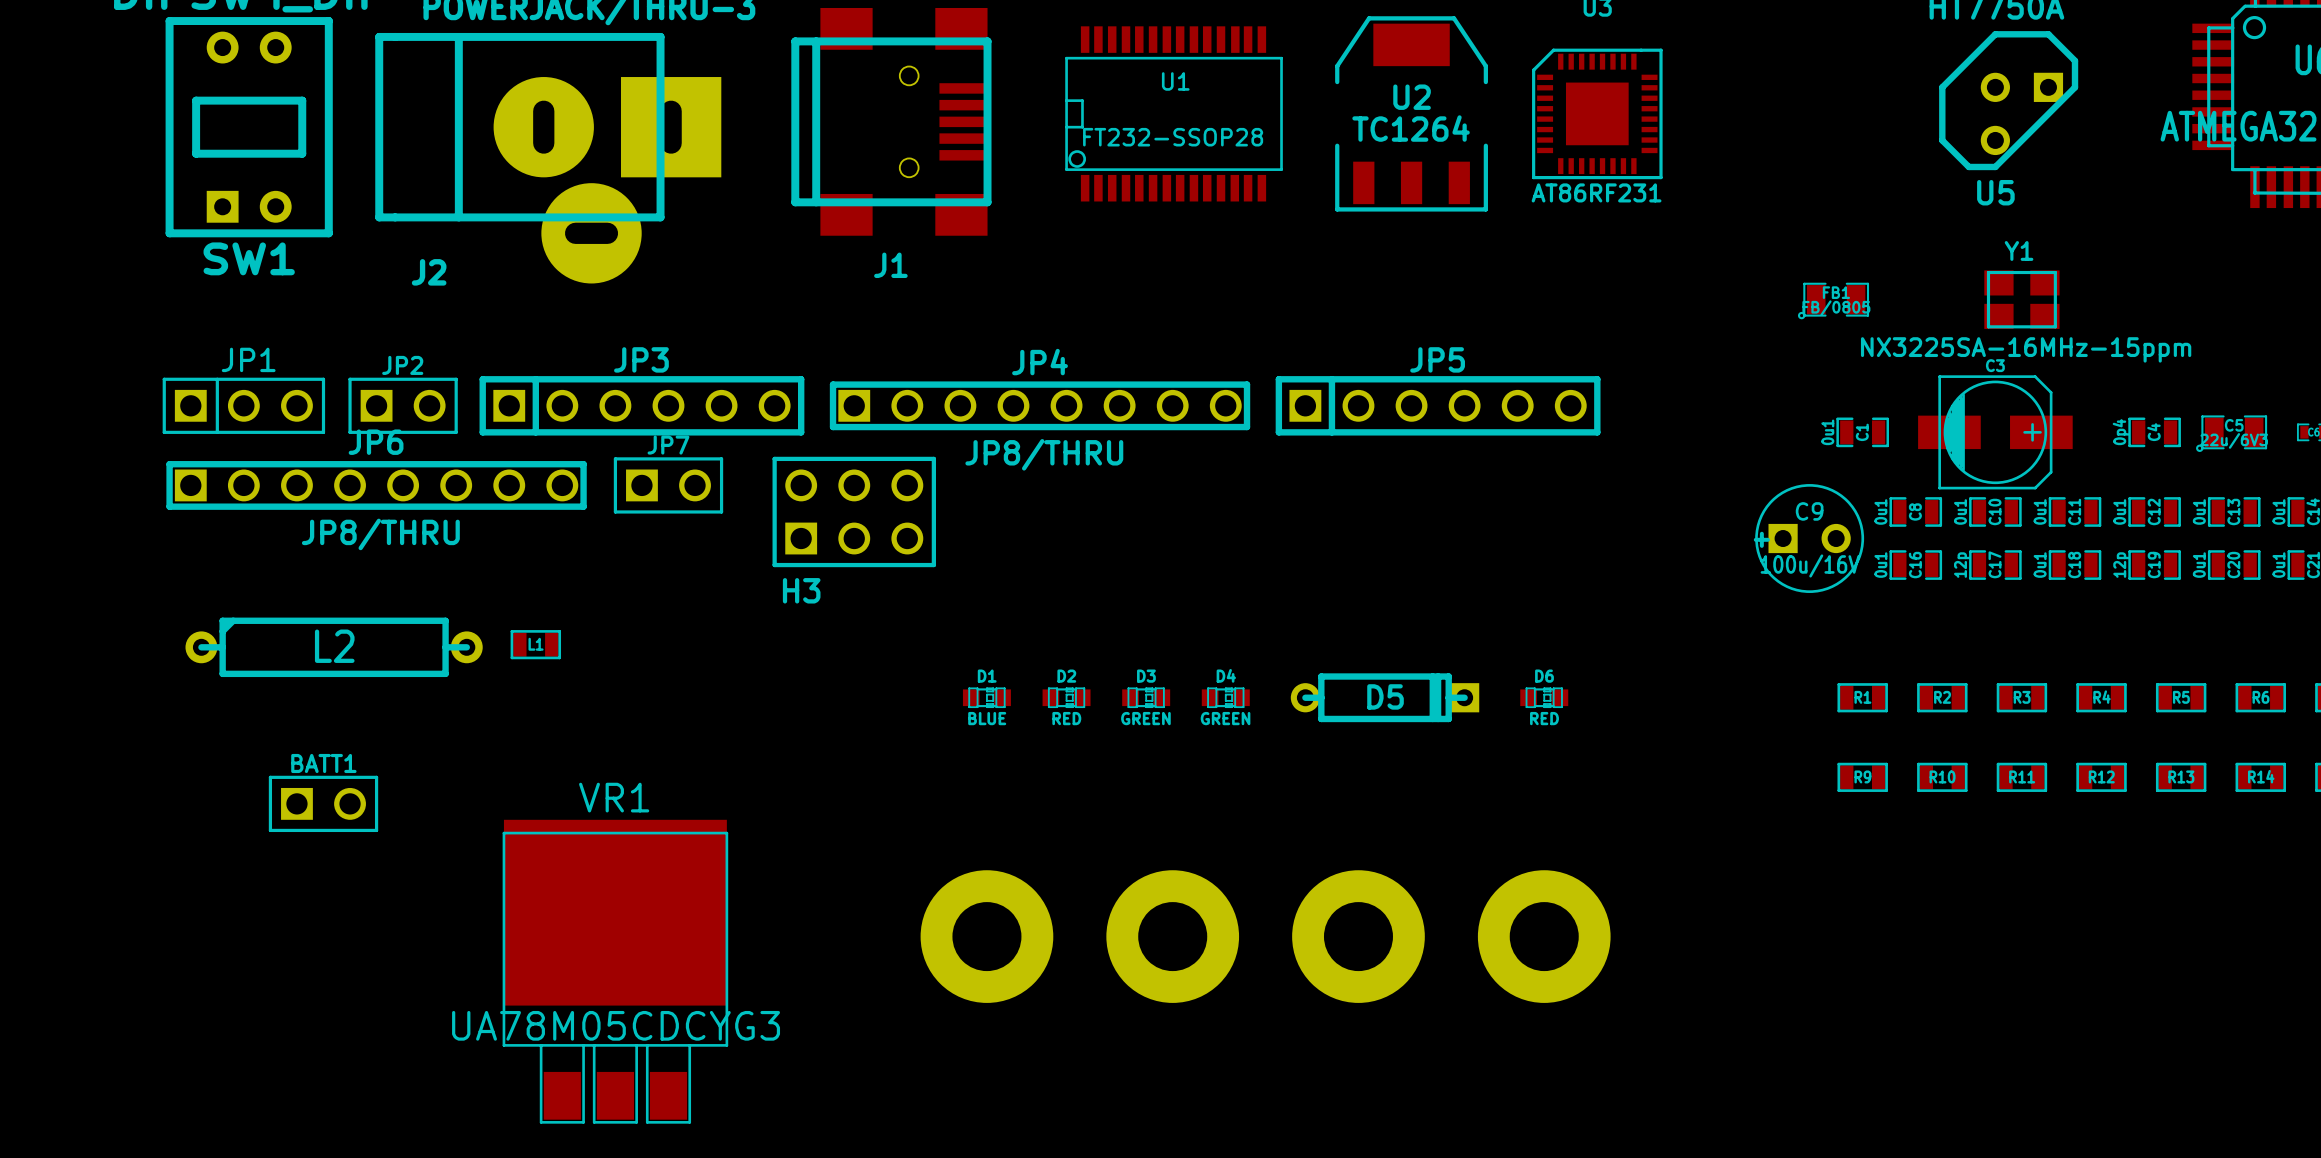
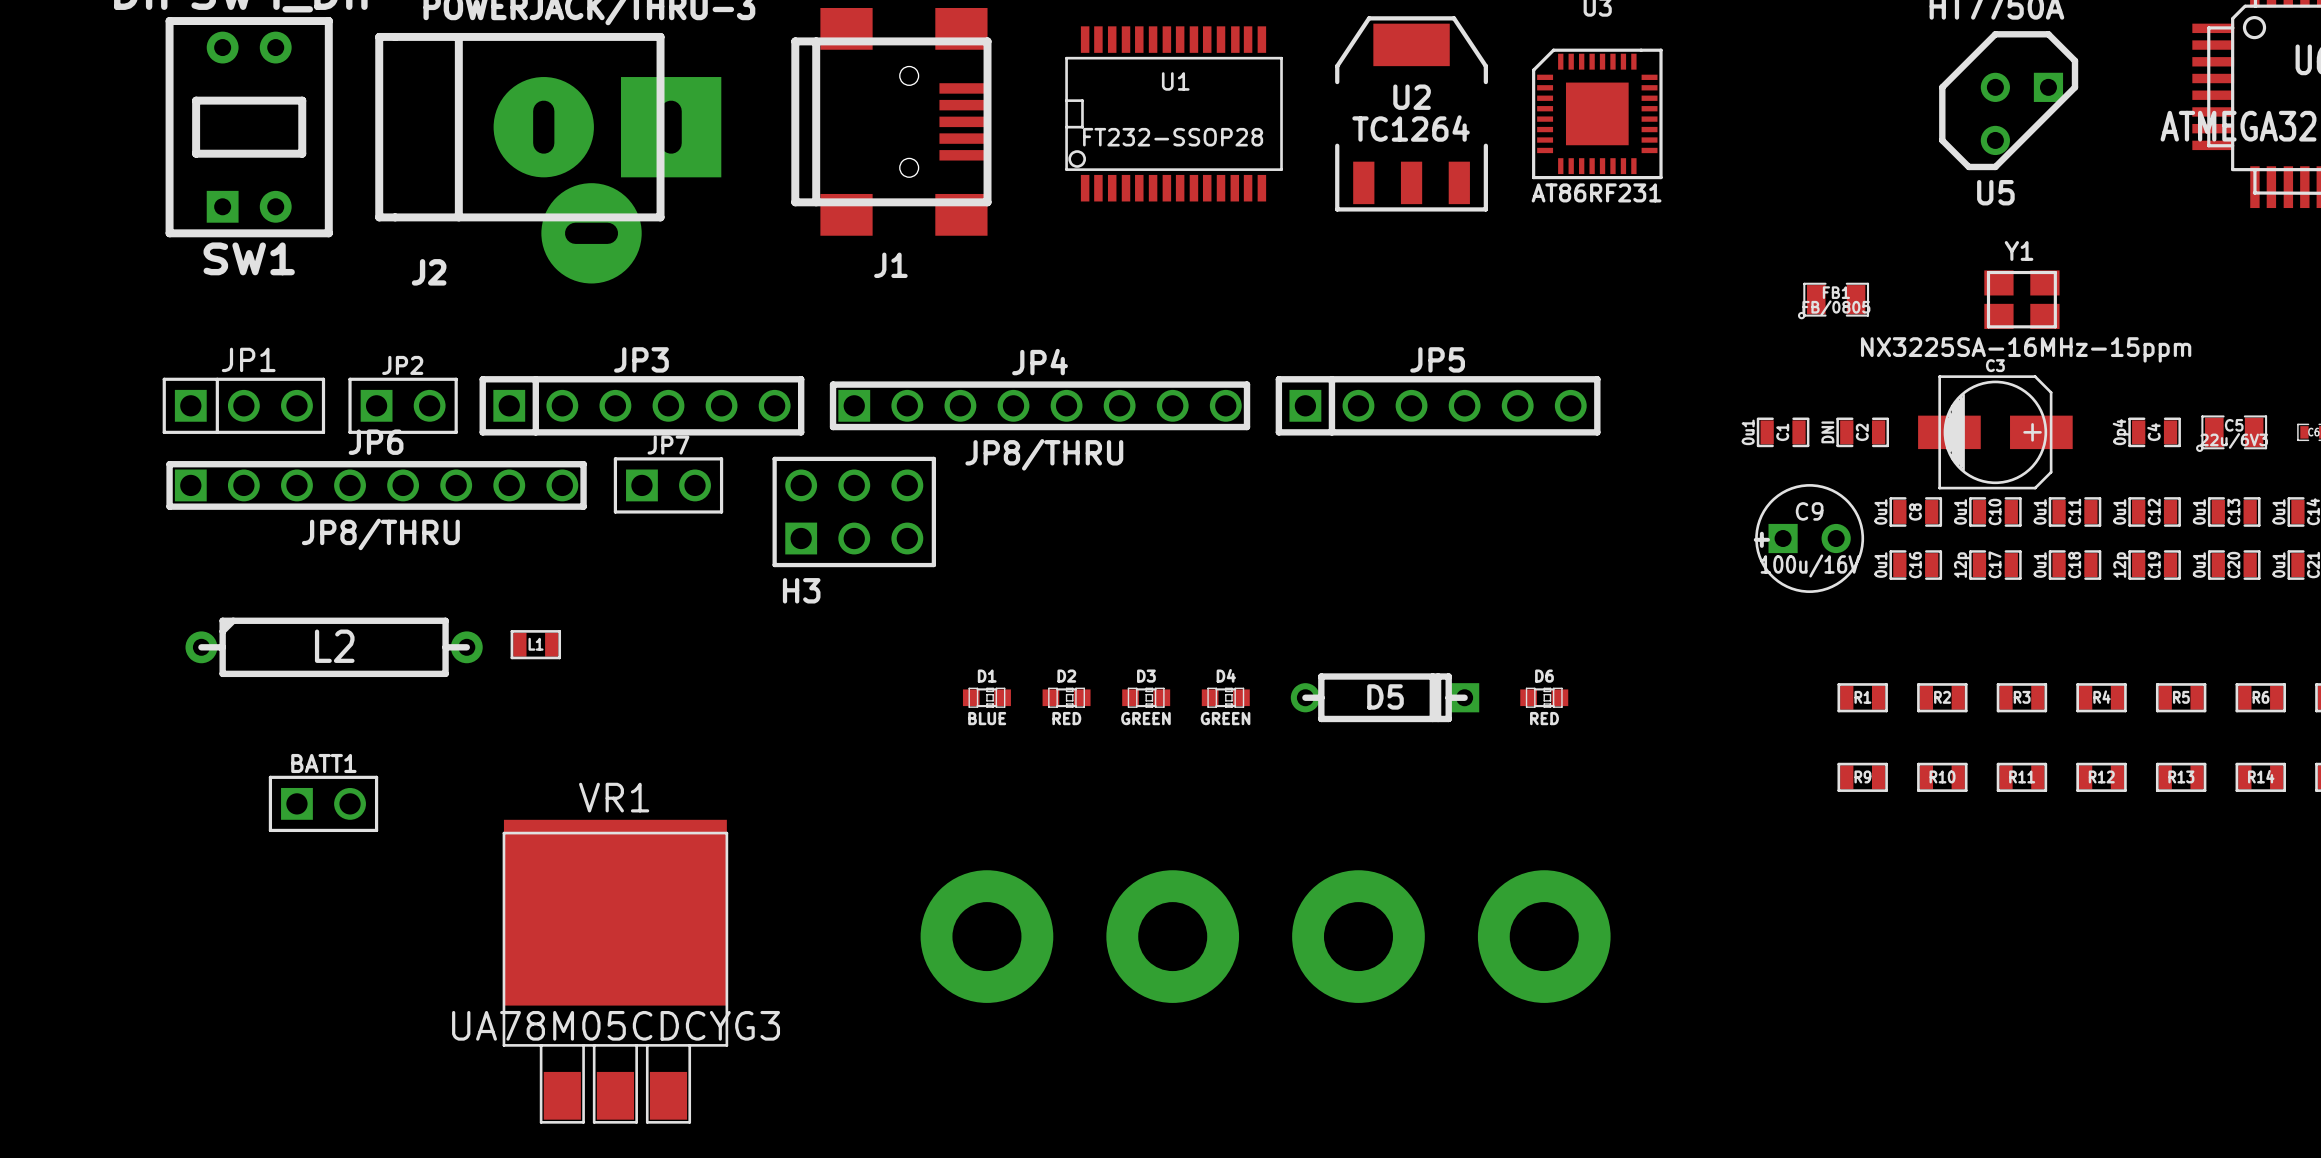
C1: none -> 0u1 (1783, 432)
C1 value: 0u1 (1827, 432) -> DNI (1827, 432)
C1 name: C1 (1862, 432) -> C2 (1862, 432)

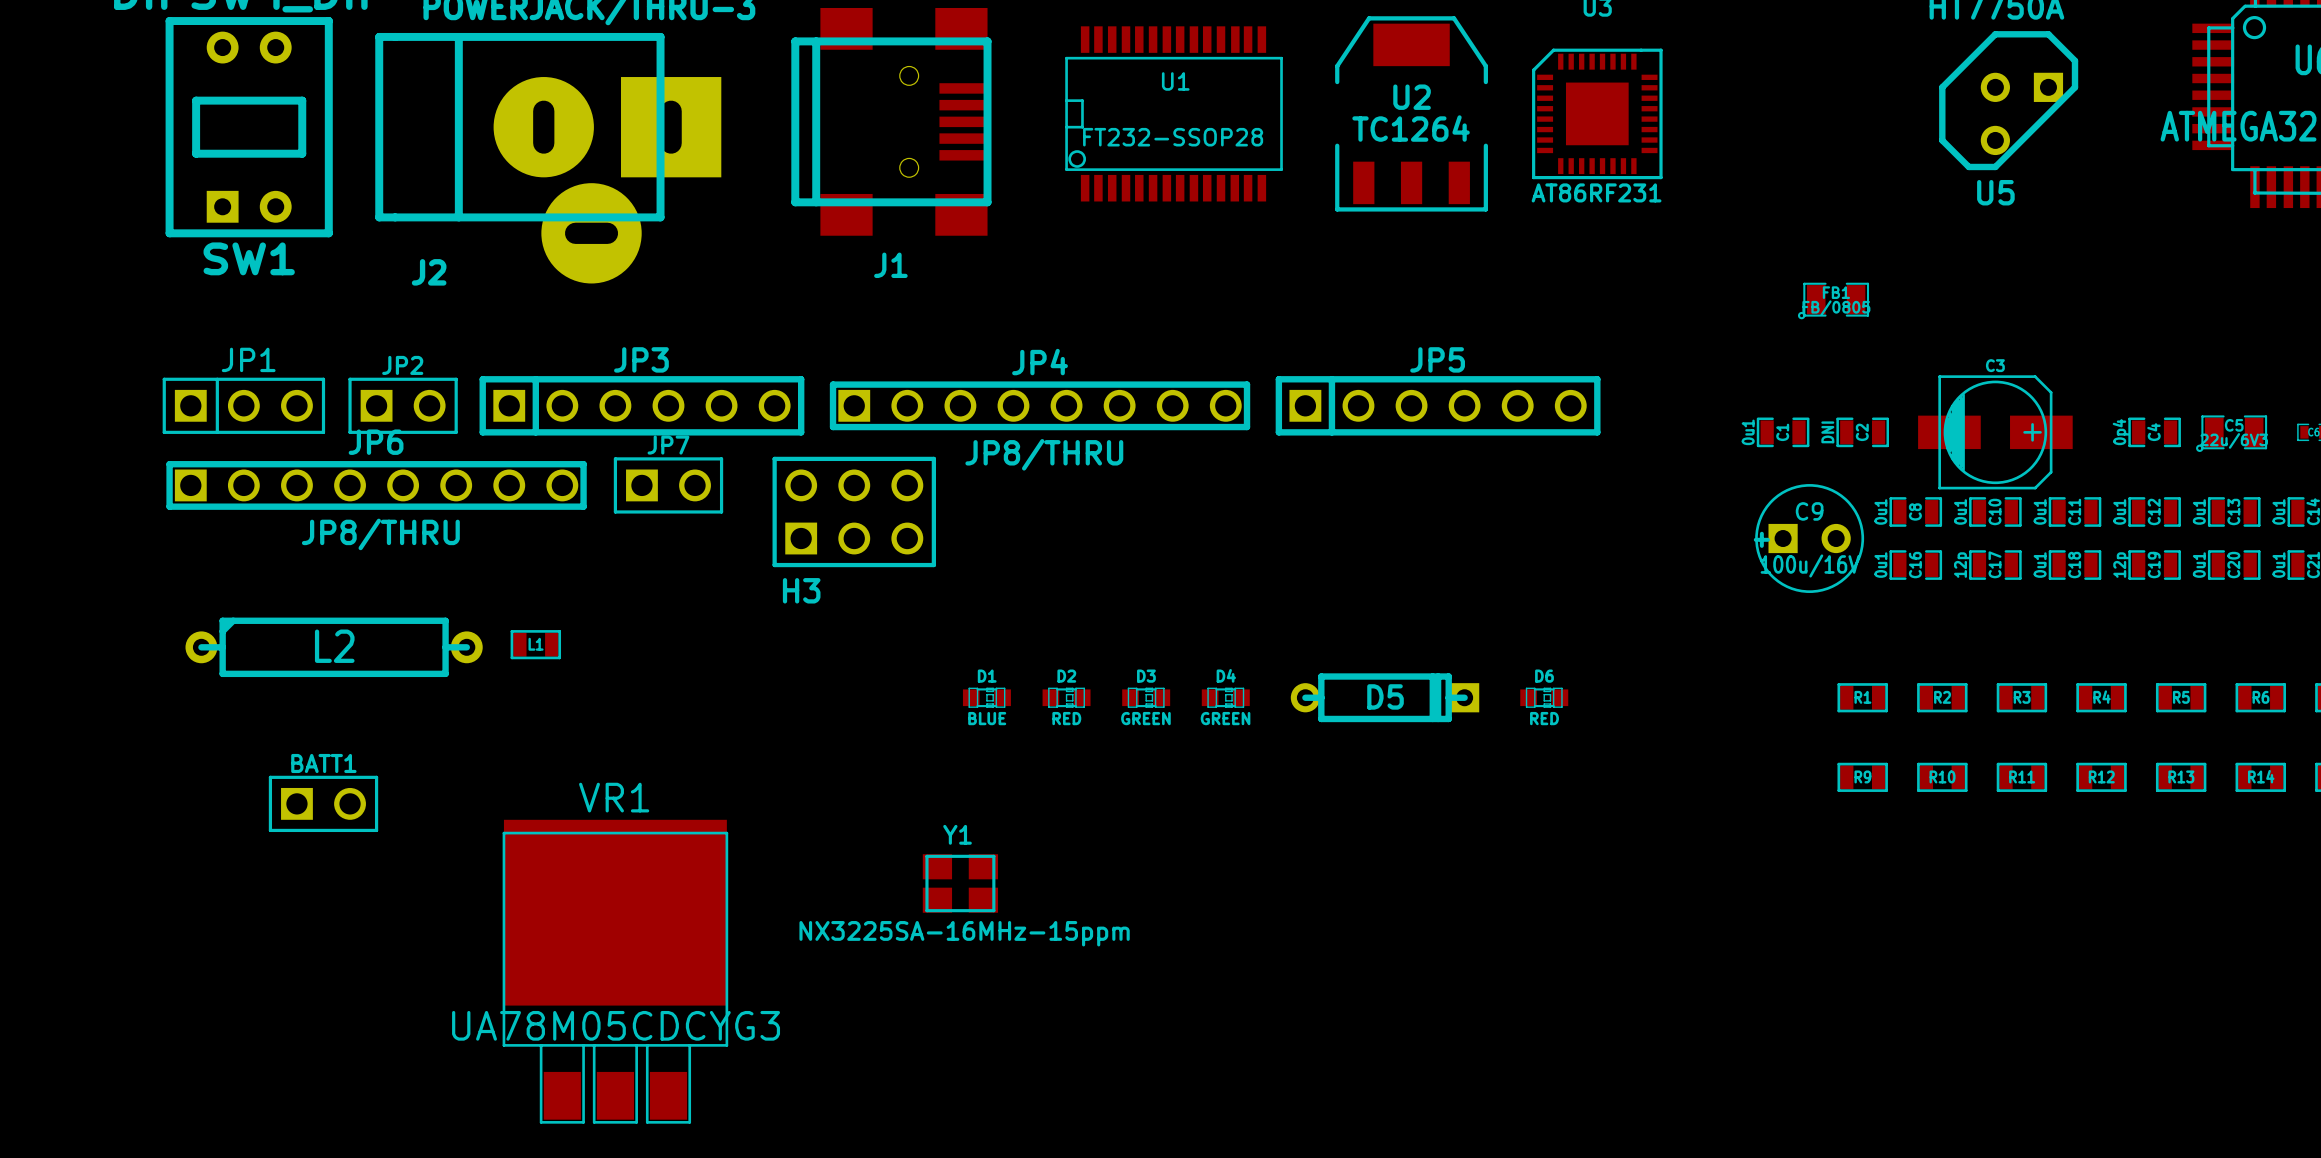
Y1 position: (2021, 299) -> (960, 883)
part: (986, 936) -> none
part: (1172, 936) -> none
part: (1358, 936) -> none
part: (1544, 936) -> none

